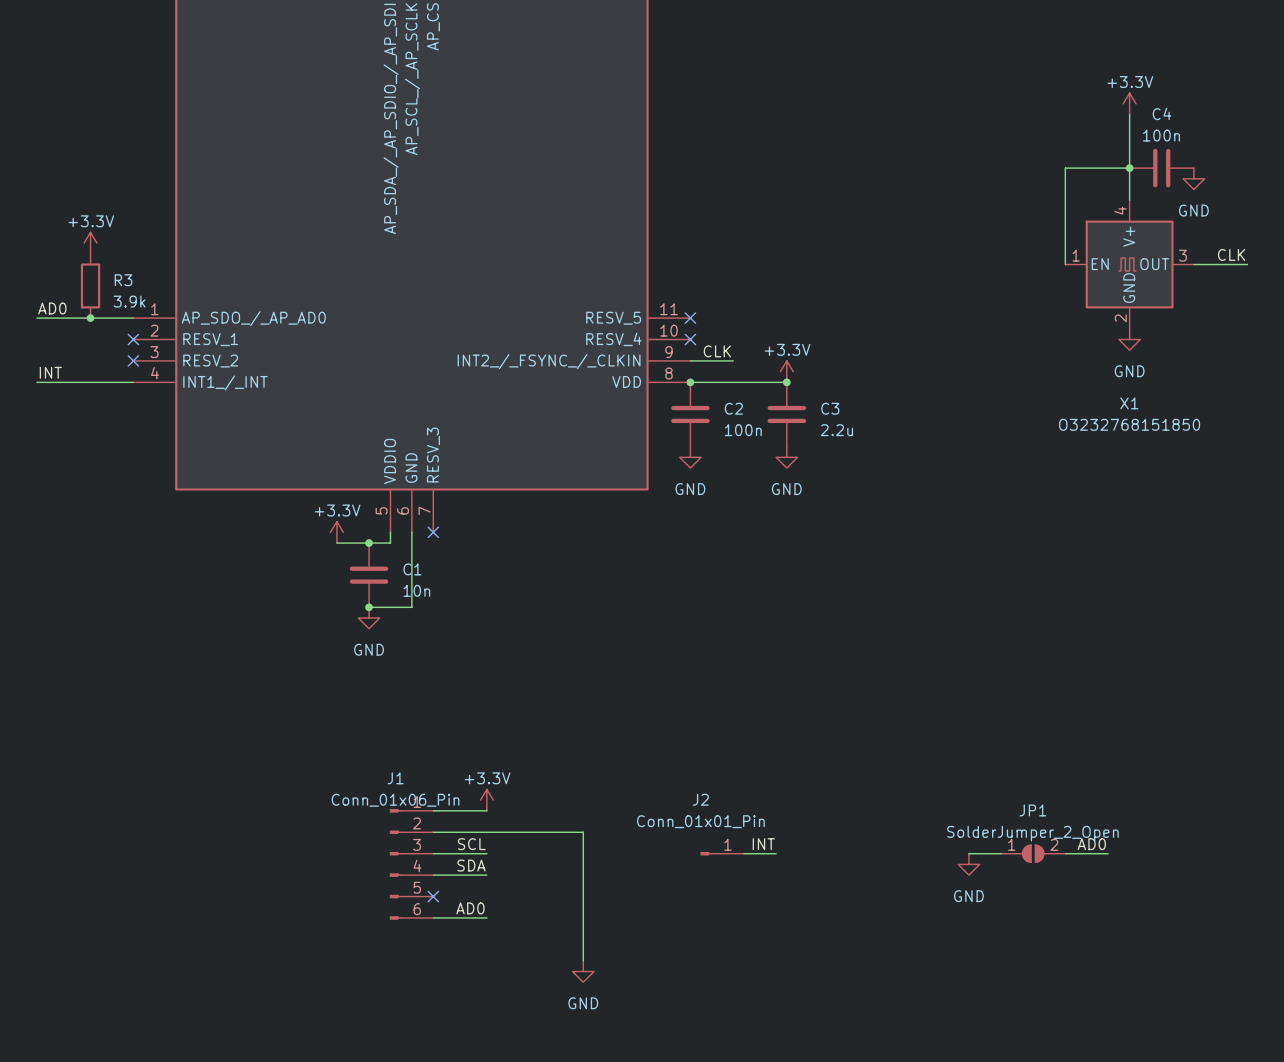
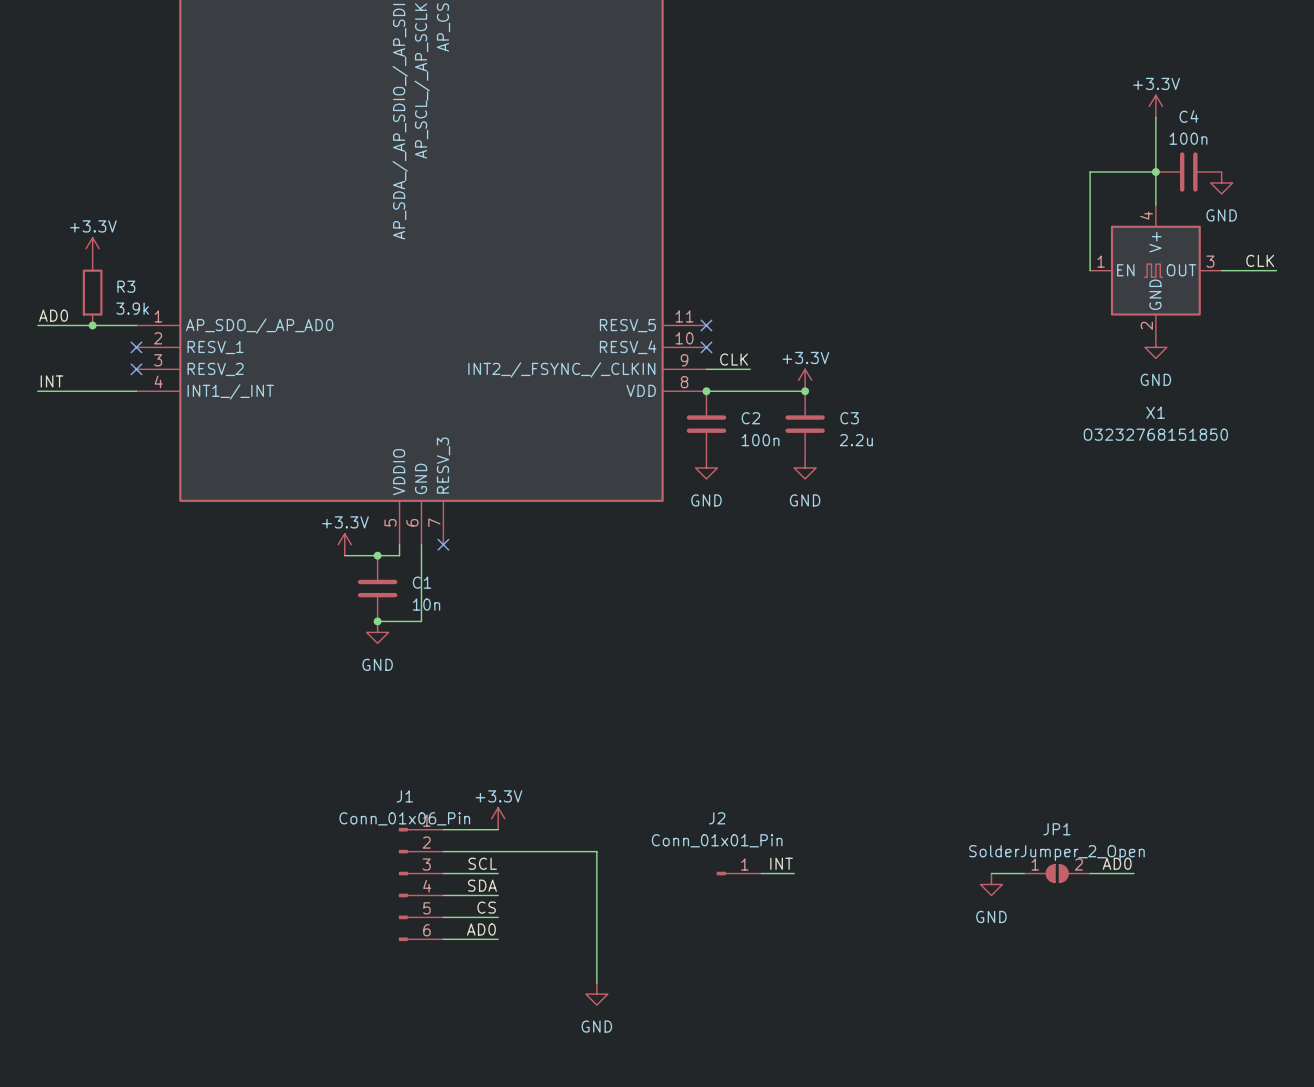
label: none -> CS (486, 907)
wire: none -> (443, 917) (498, 917)
no-connect mark: (433, 896) -> none

